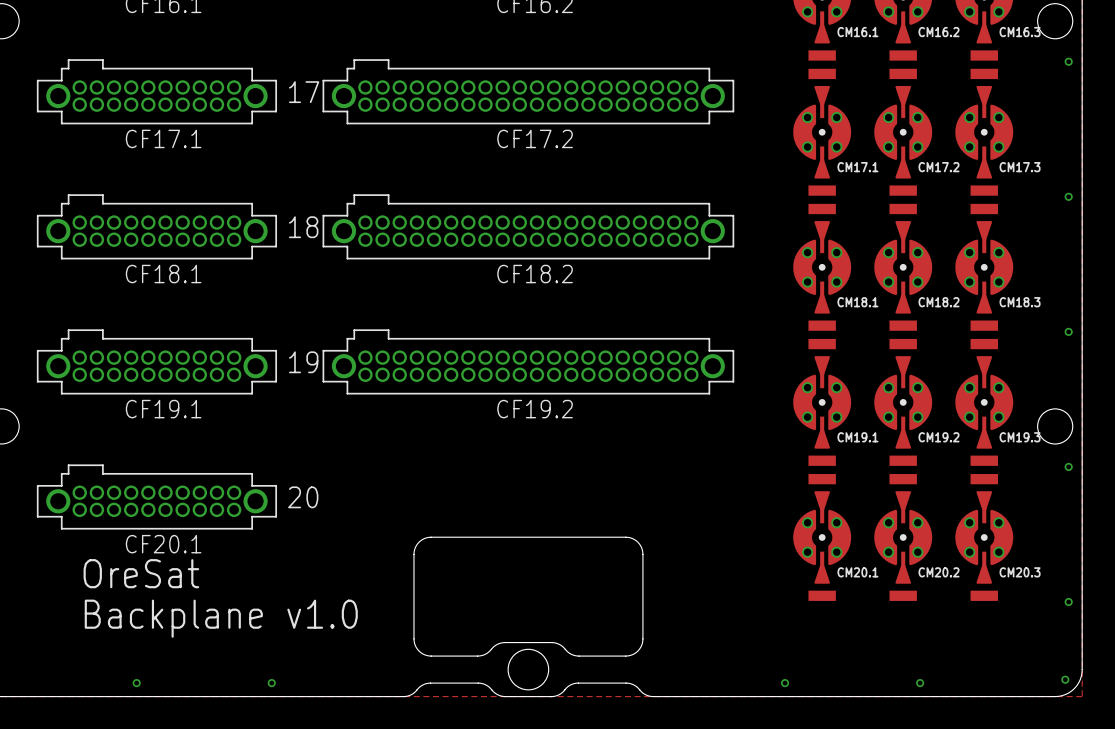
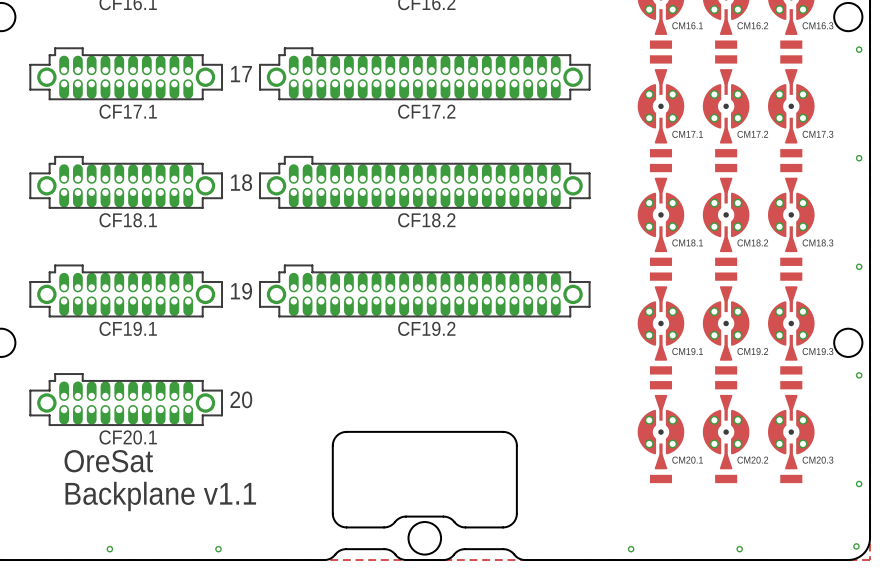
CF17.1 footprint: [36, 59, 278, 125] -> [29, 47, 223, 100]
CF17.2 footprint: [322, 59, 735, 125] -> [259, 47, 591, 100]
CF18.1 footprint: [36, 194, 278, 260] -> [29, 156, 223, 209]
CF18.2 footprint: [322, 194, 735, 260] -> [259, 156, 591, 209]
CF19.1 footprint: [36, 329, 278, 395] -> [29, 264, 223, 318]
CF19.2 footprint: [322, 329, 735, 395] -> [259, 264, 591, 318]
CF20.1 footprint: [36, 464, 278, 530] -> [29, 373, 223, 426]
text: Backplane v1.0 (221, 618) -> Backplane v1.1 (160, 496)

